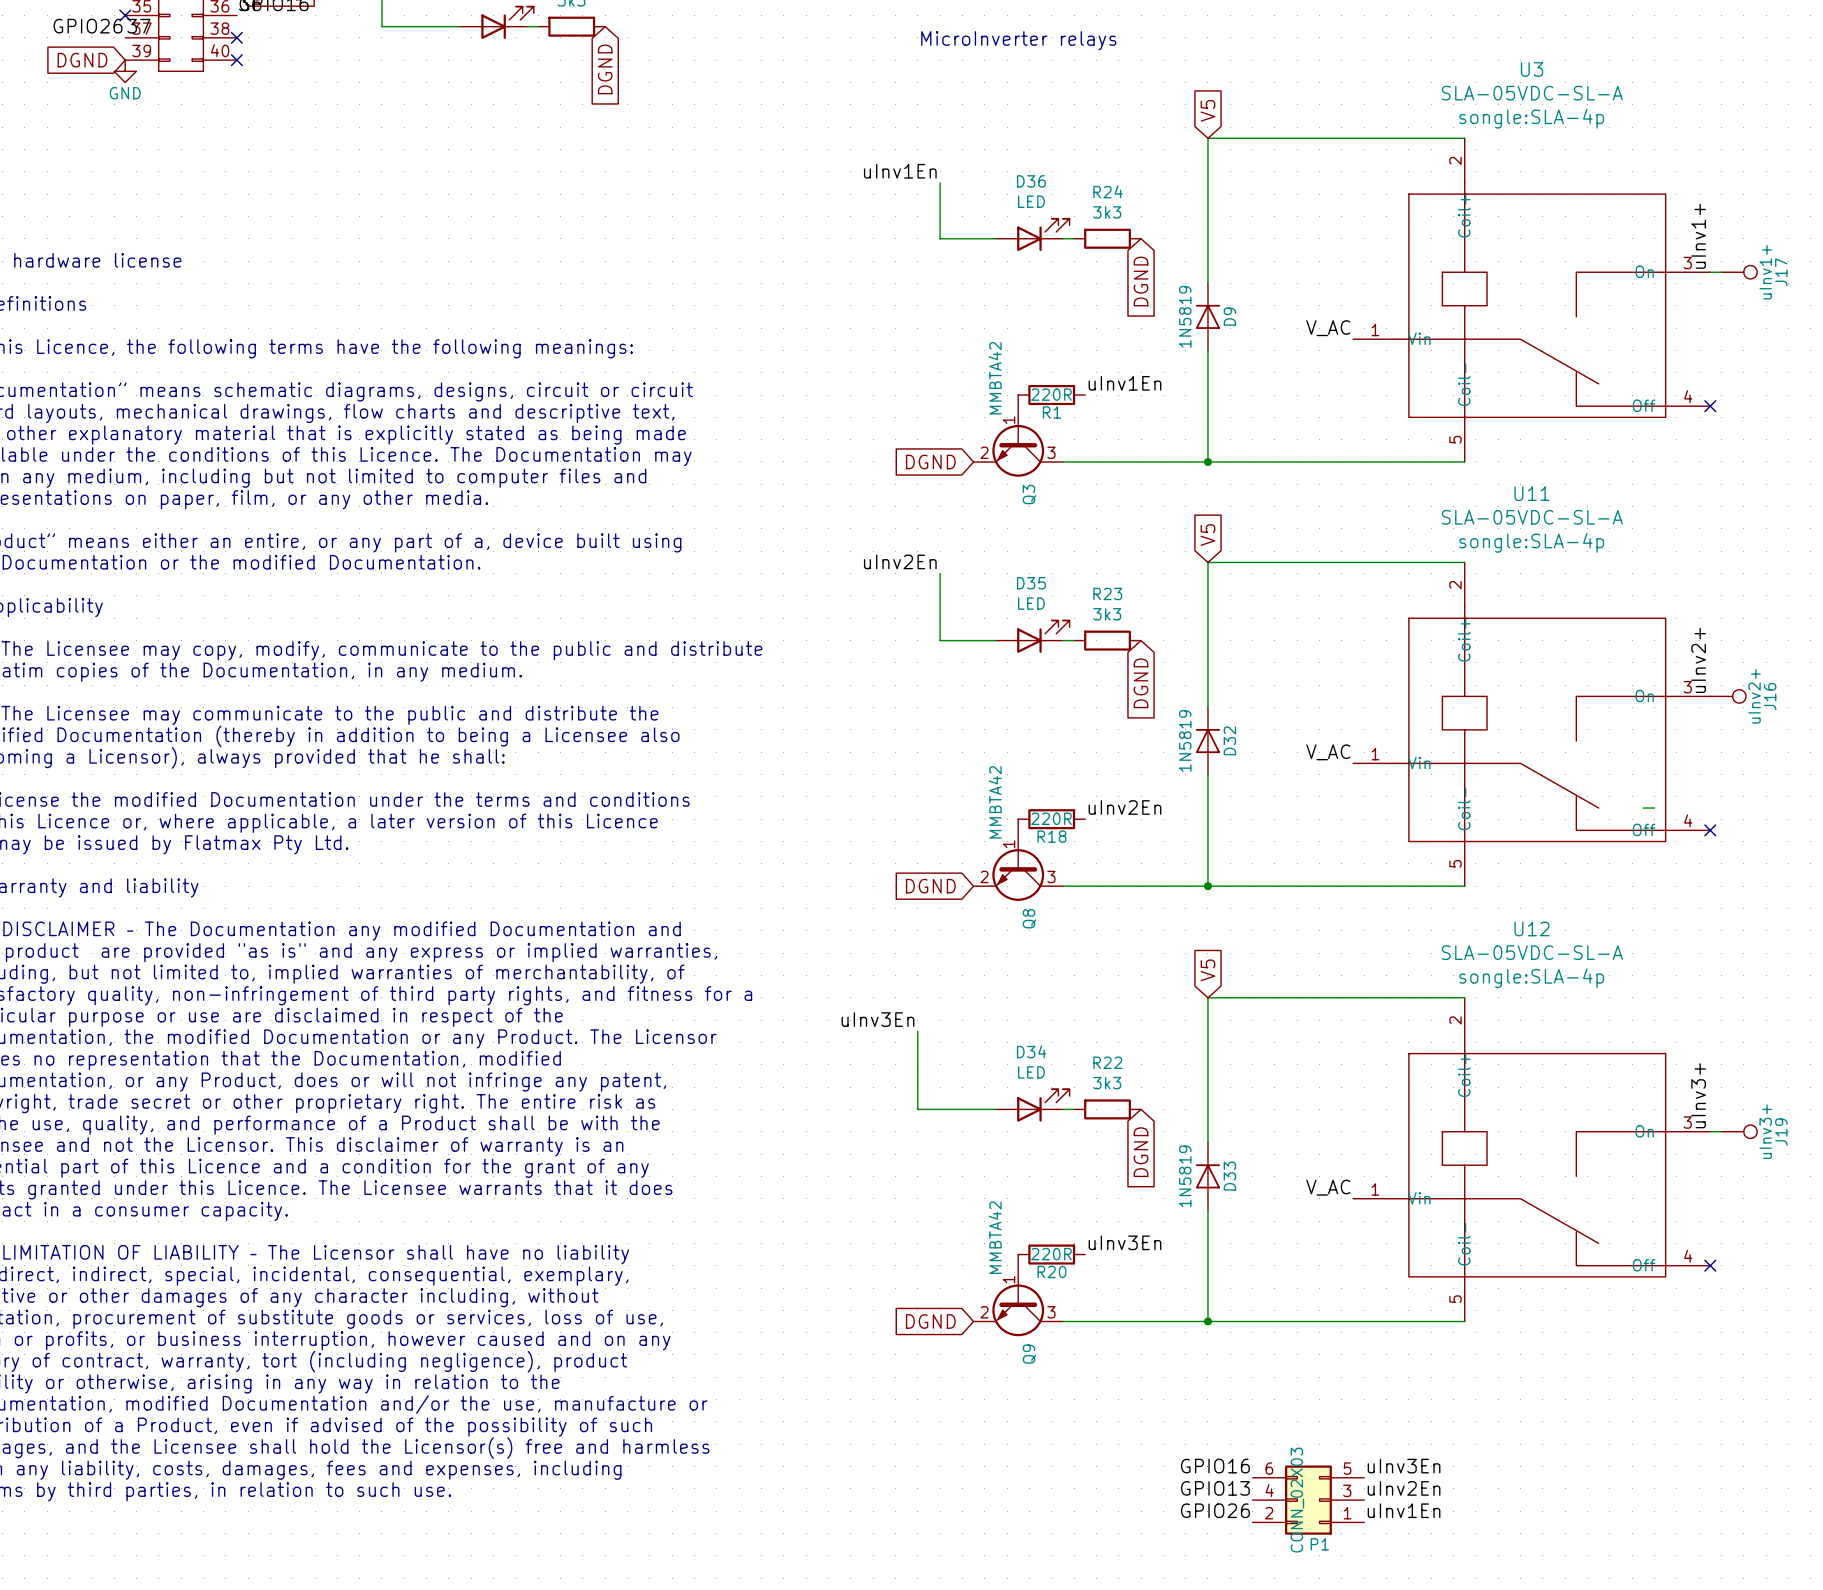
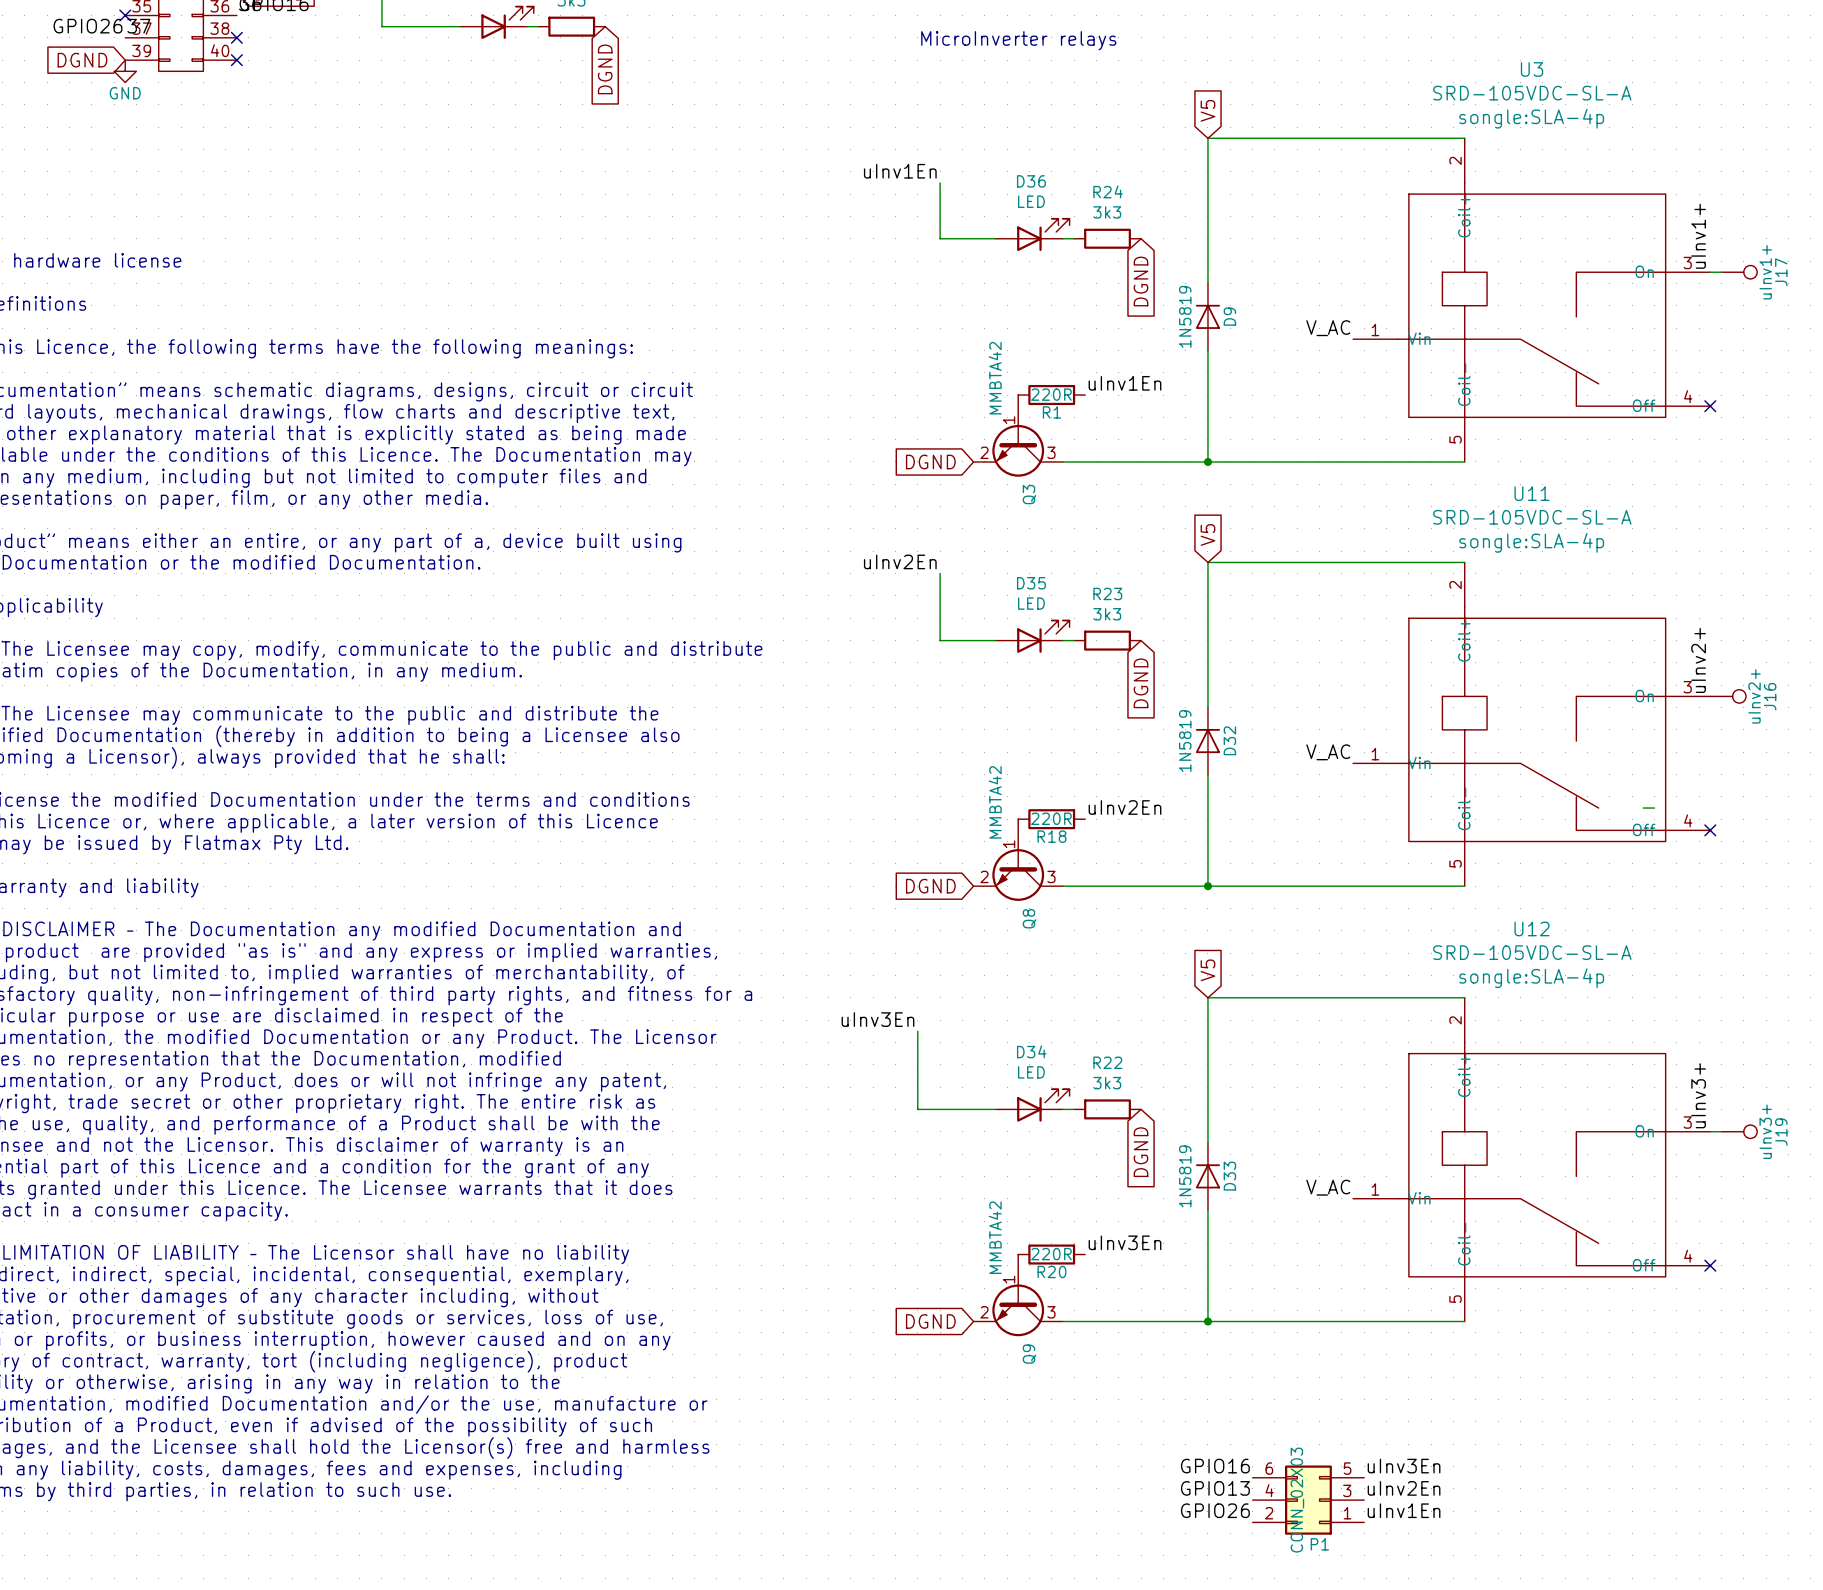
U3 value: SLA-05VDC-SL-A (1532, 93) -> SRD-105VDC-SL-A (1532, 93)
U11 value: SLA-05VDC-SL-A (1532, 517) -> SRD-105VDC-SL-A (1532, 517)
U12 value: SLA-05VDC-SL-A (1532, 952) -> SRD-105VDC-SL-A (1532, 952)

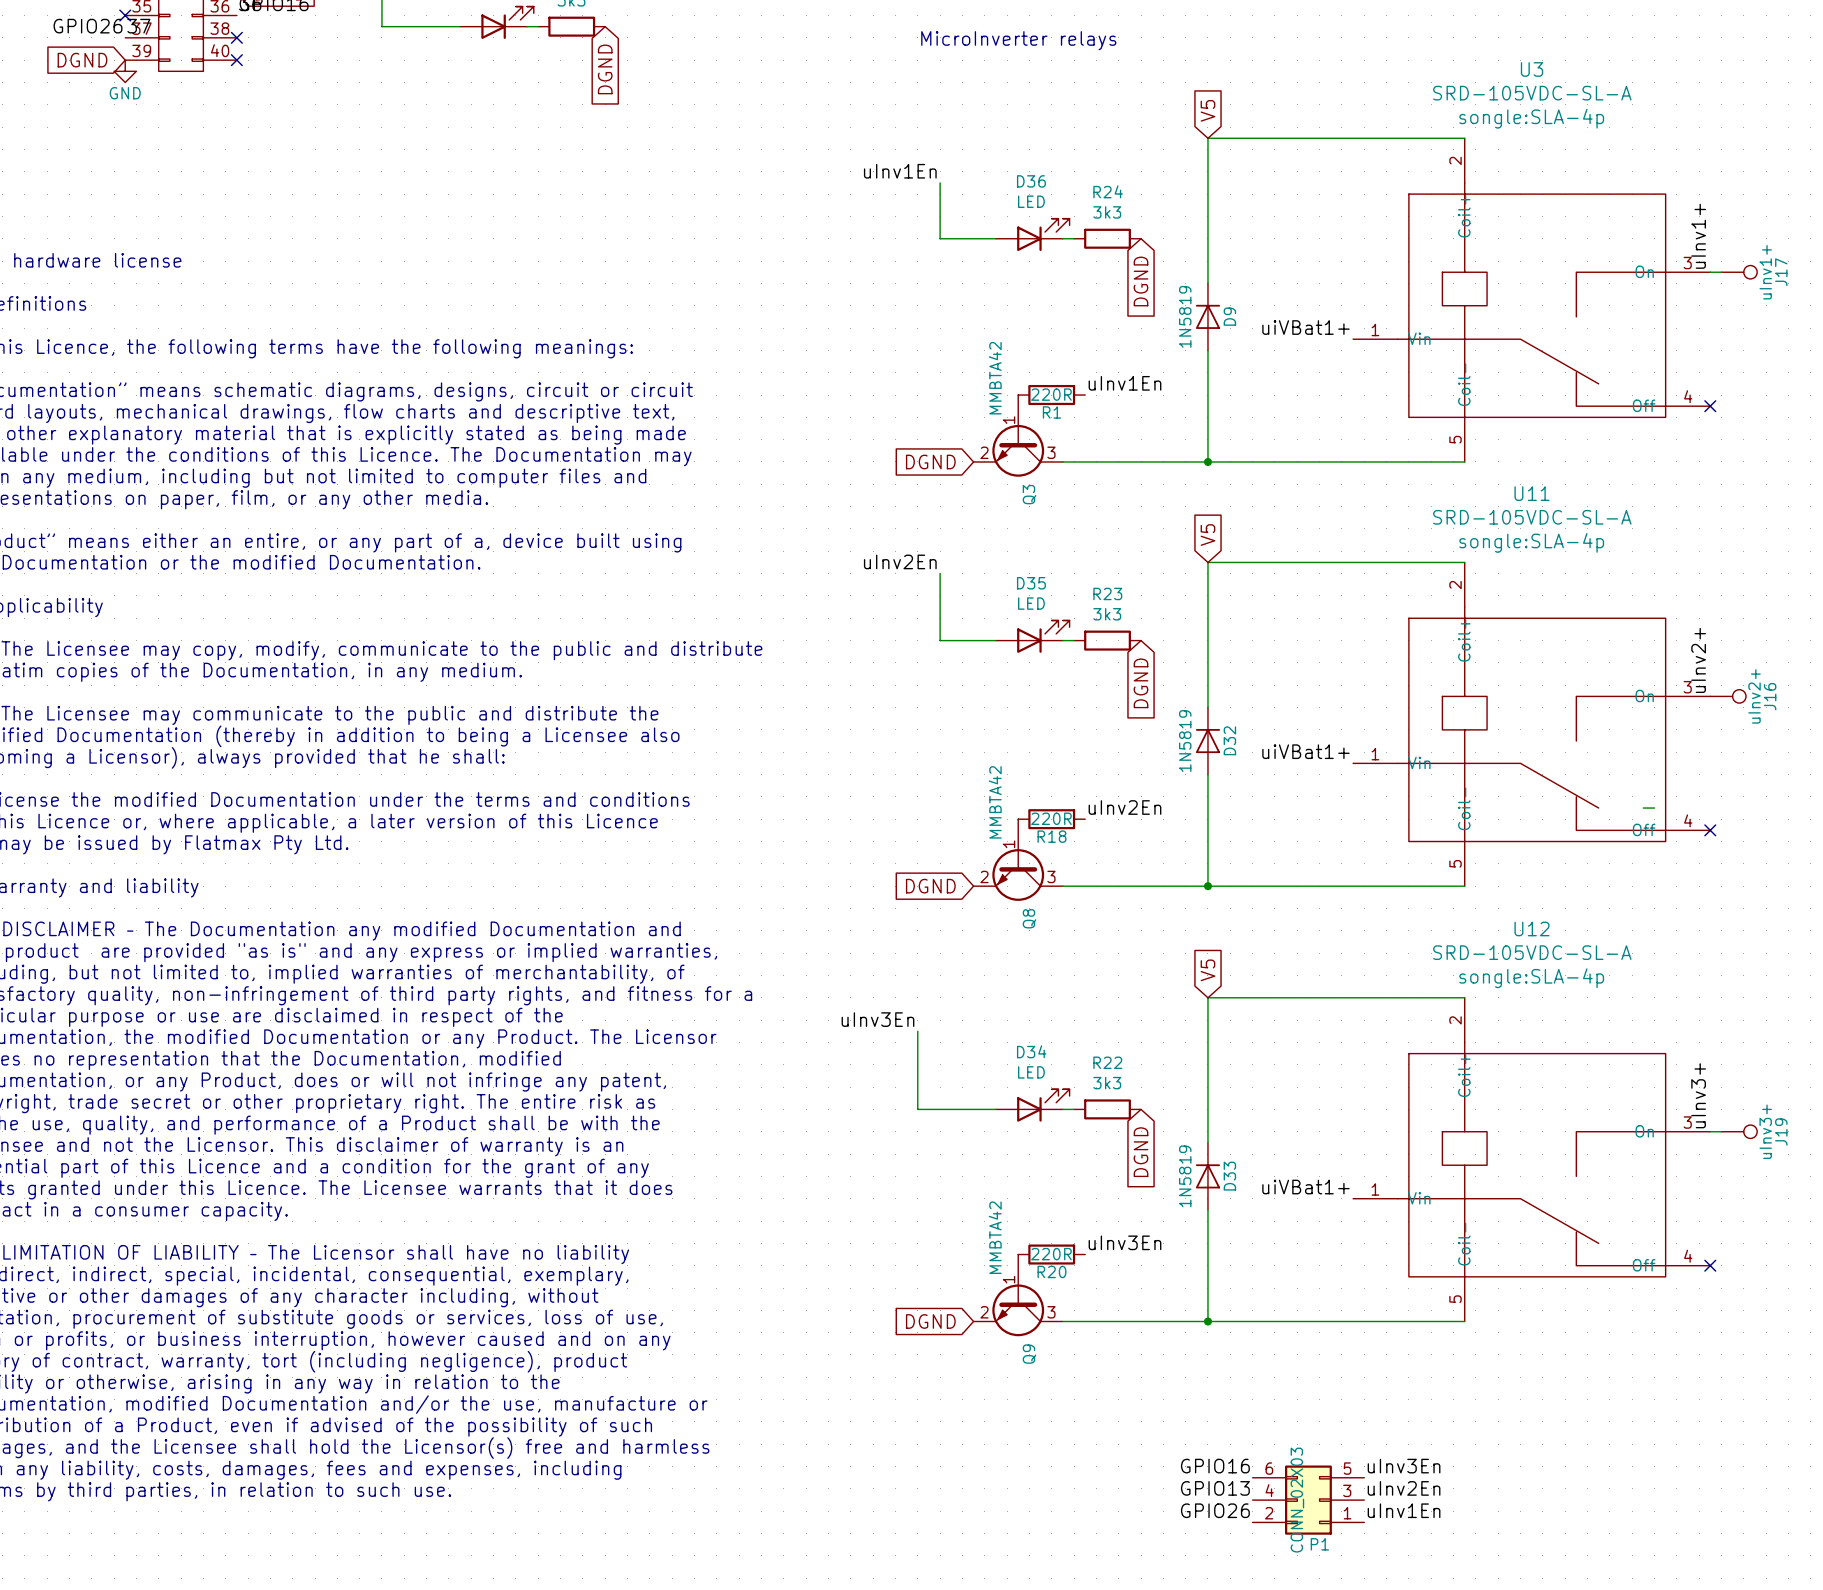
label: V_AC (1328, 328) -> uiVBat1+ (1305, 327)
label: V_AC (1328, 752) -> uiVBat1+ (1305, 751)
label: V_AC (1328, 1187) -> uiVBat1+ (1305, 1187)

